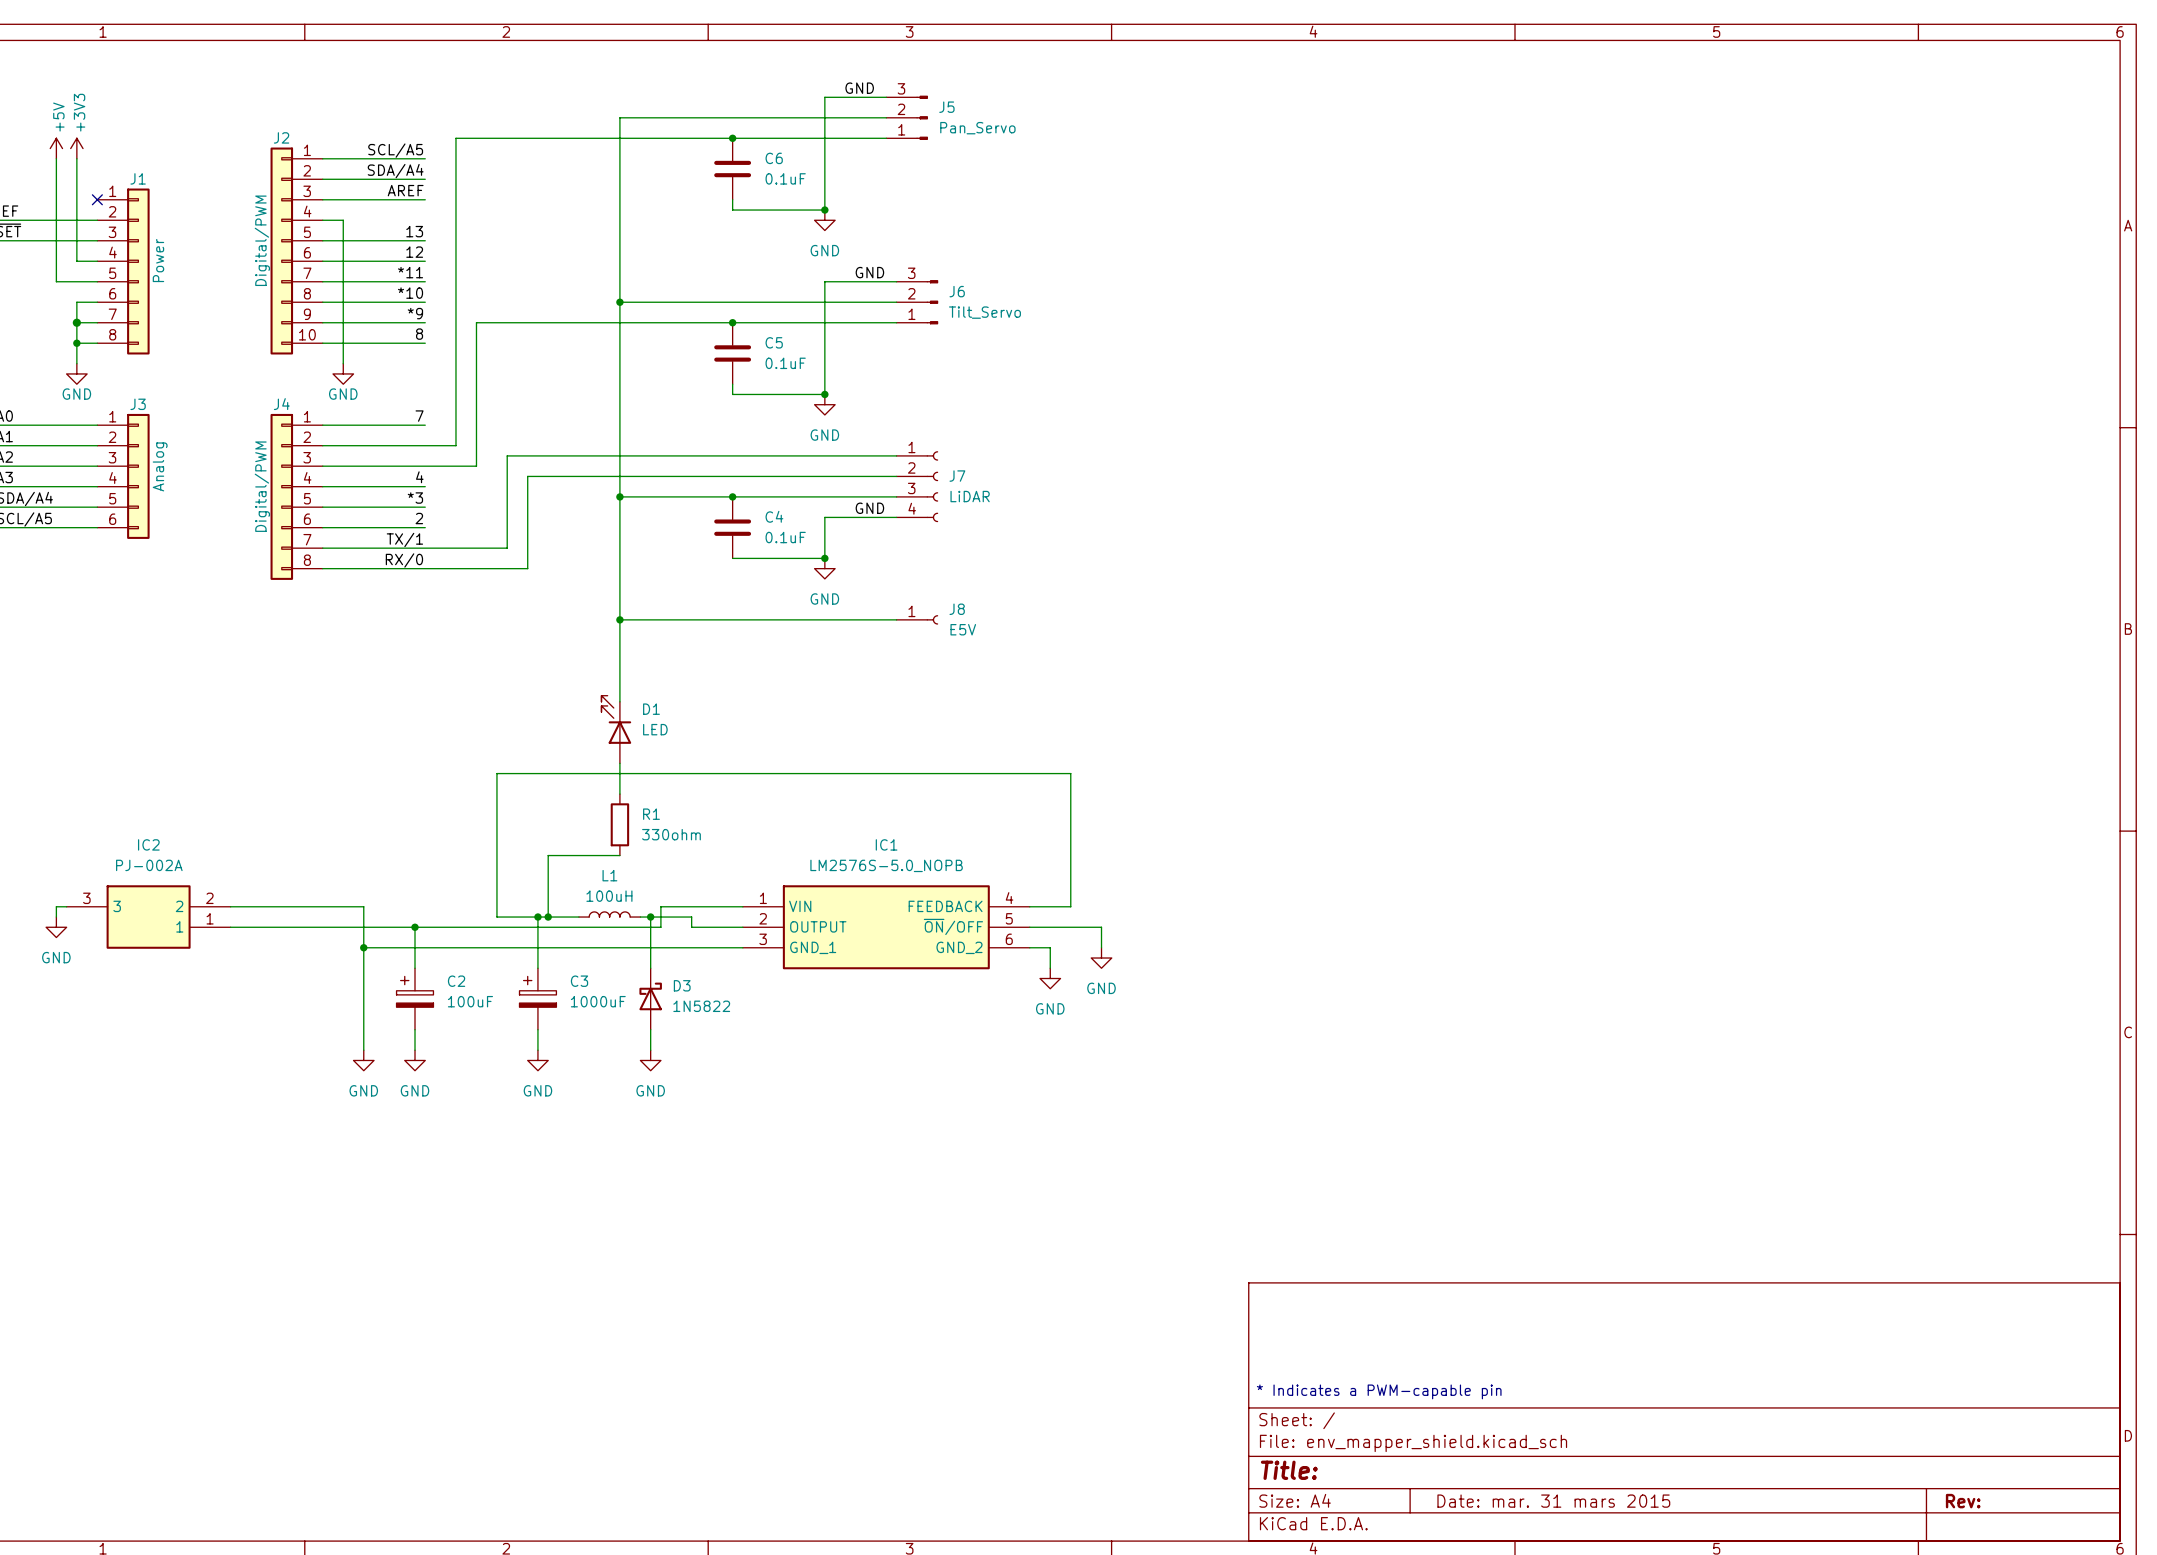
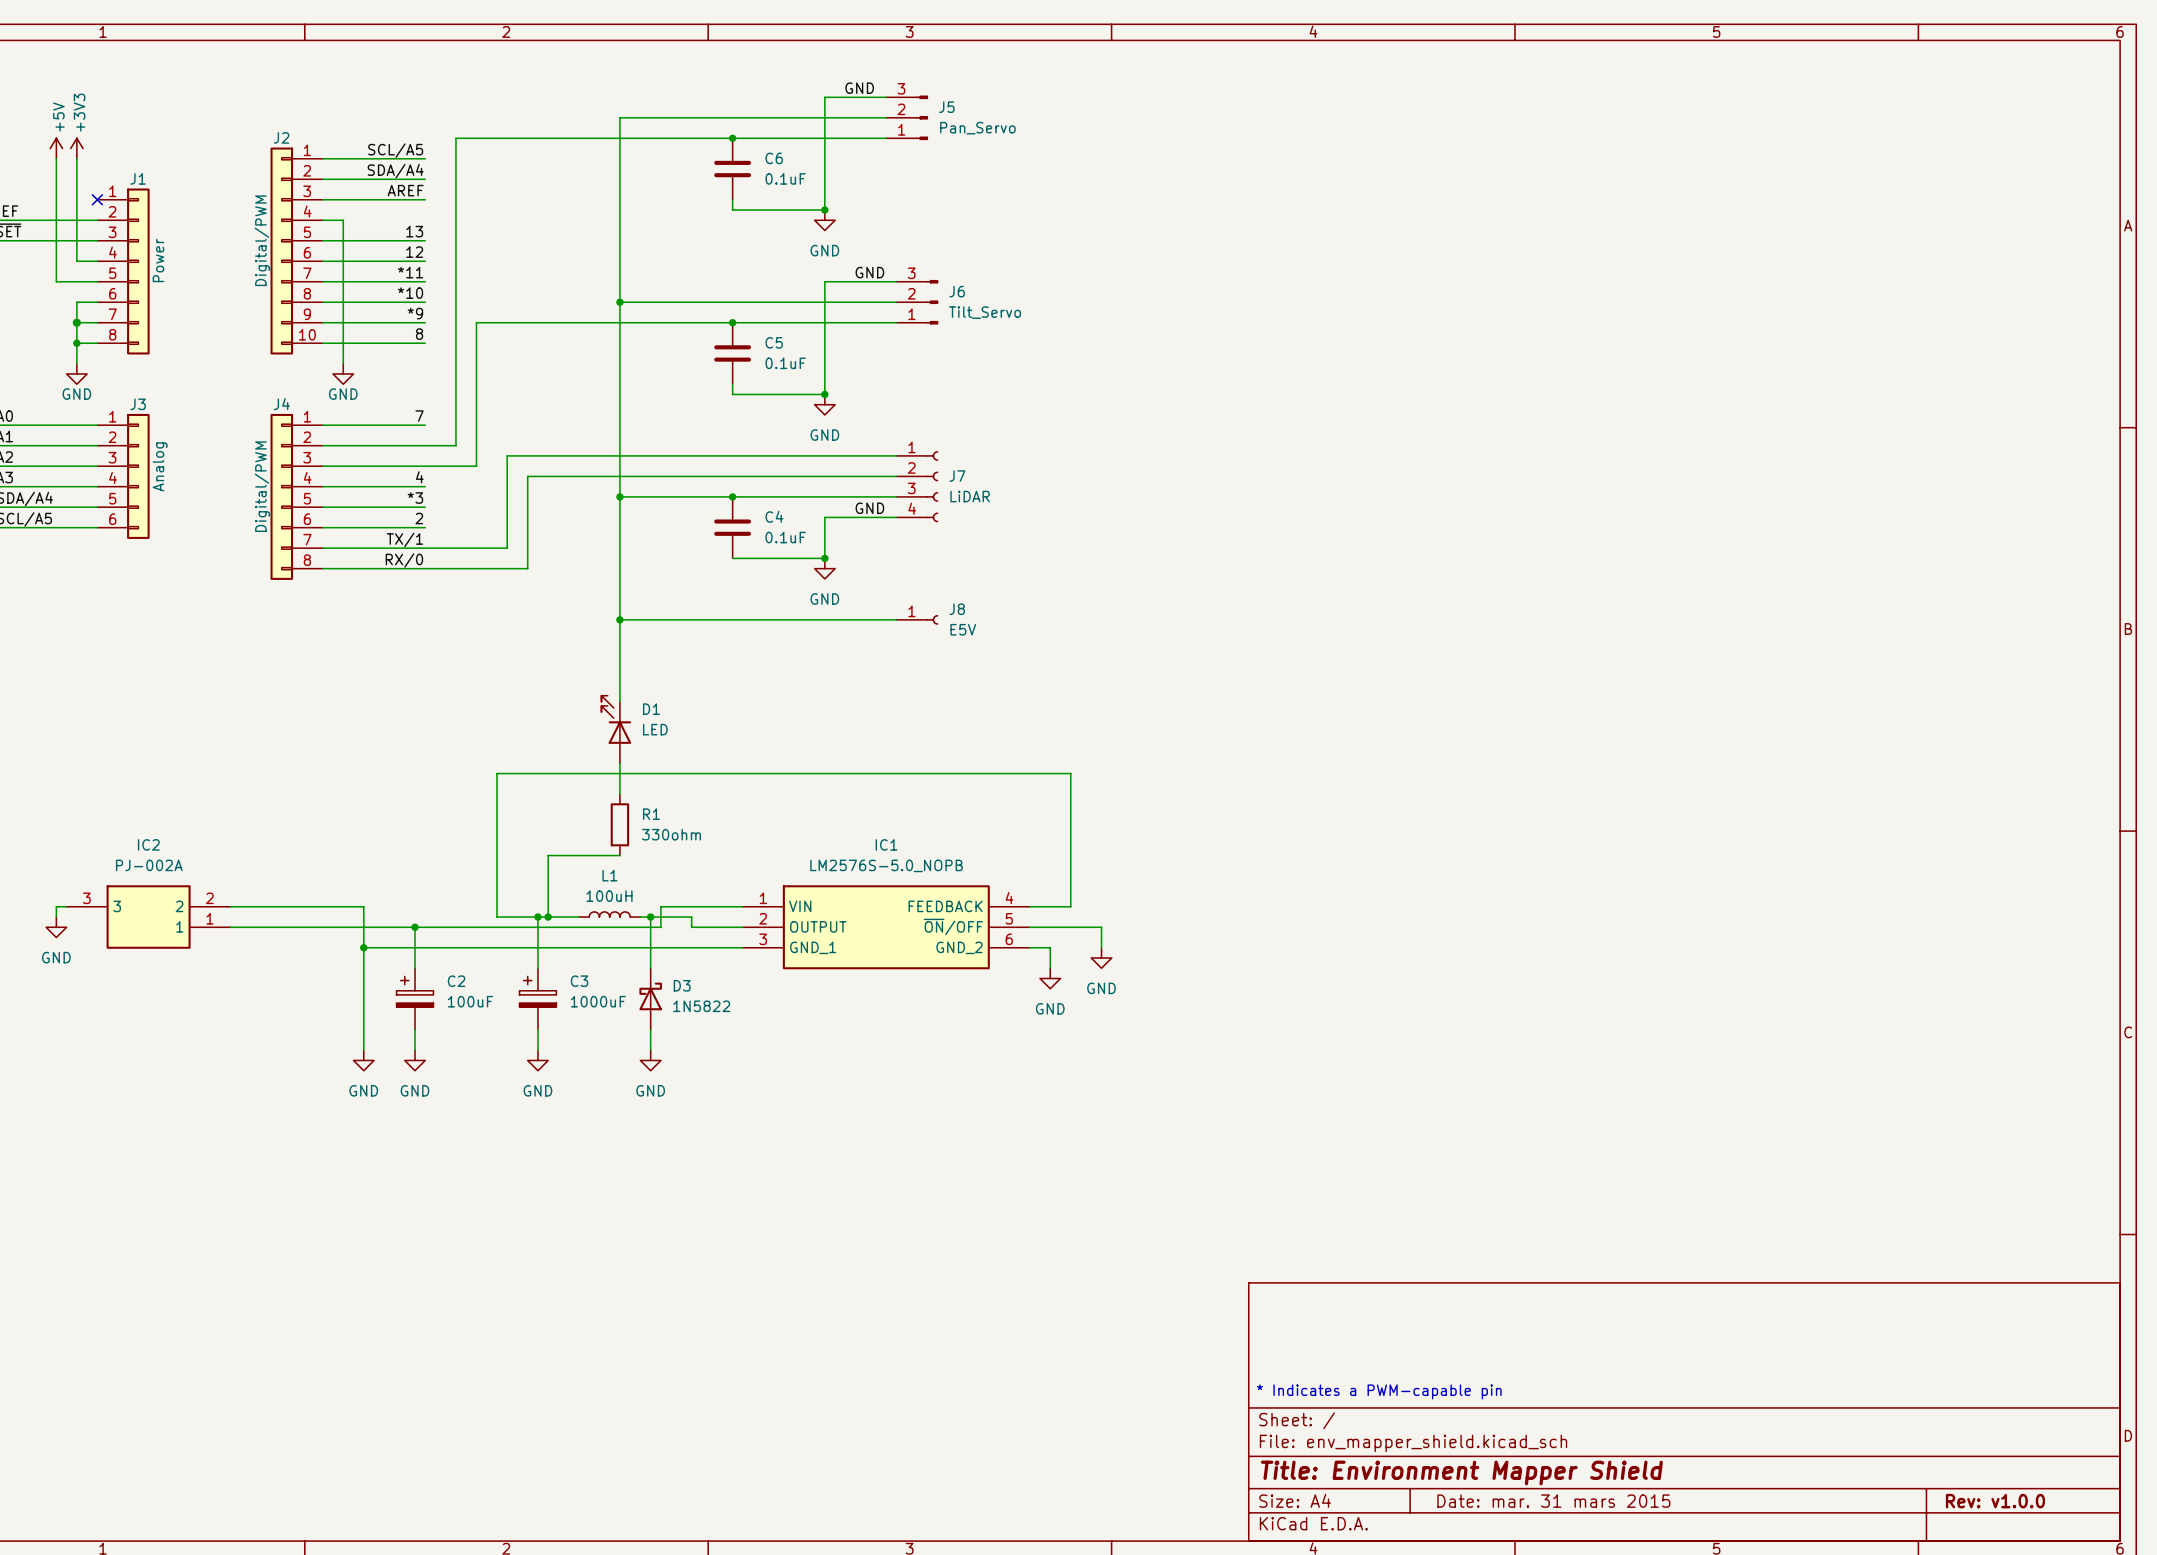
title block: Title: (1289, 1470) -> Title: Environment Mapper Shield (1461, 1472)
title block: Rev: (1963, 1501) -> Rev: v1.0.0 (1995, 1501)

